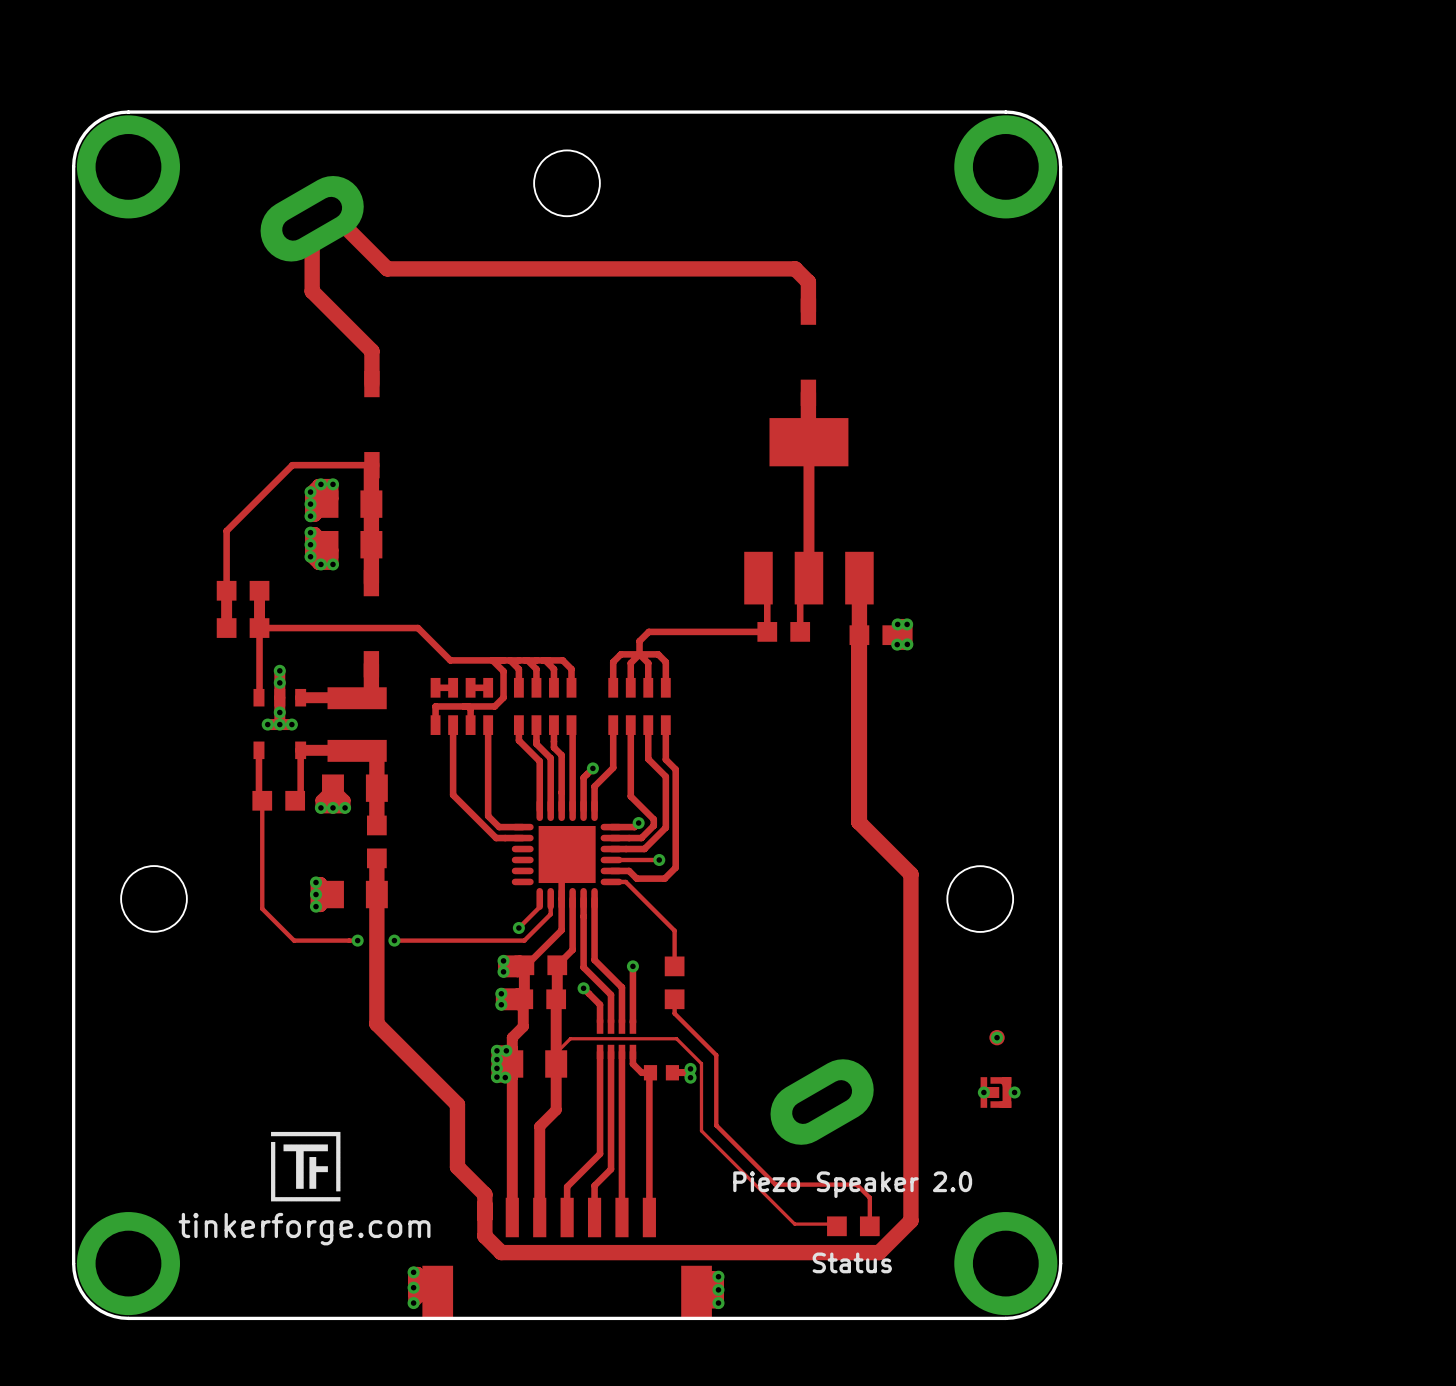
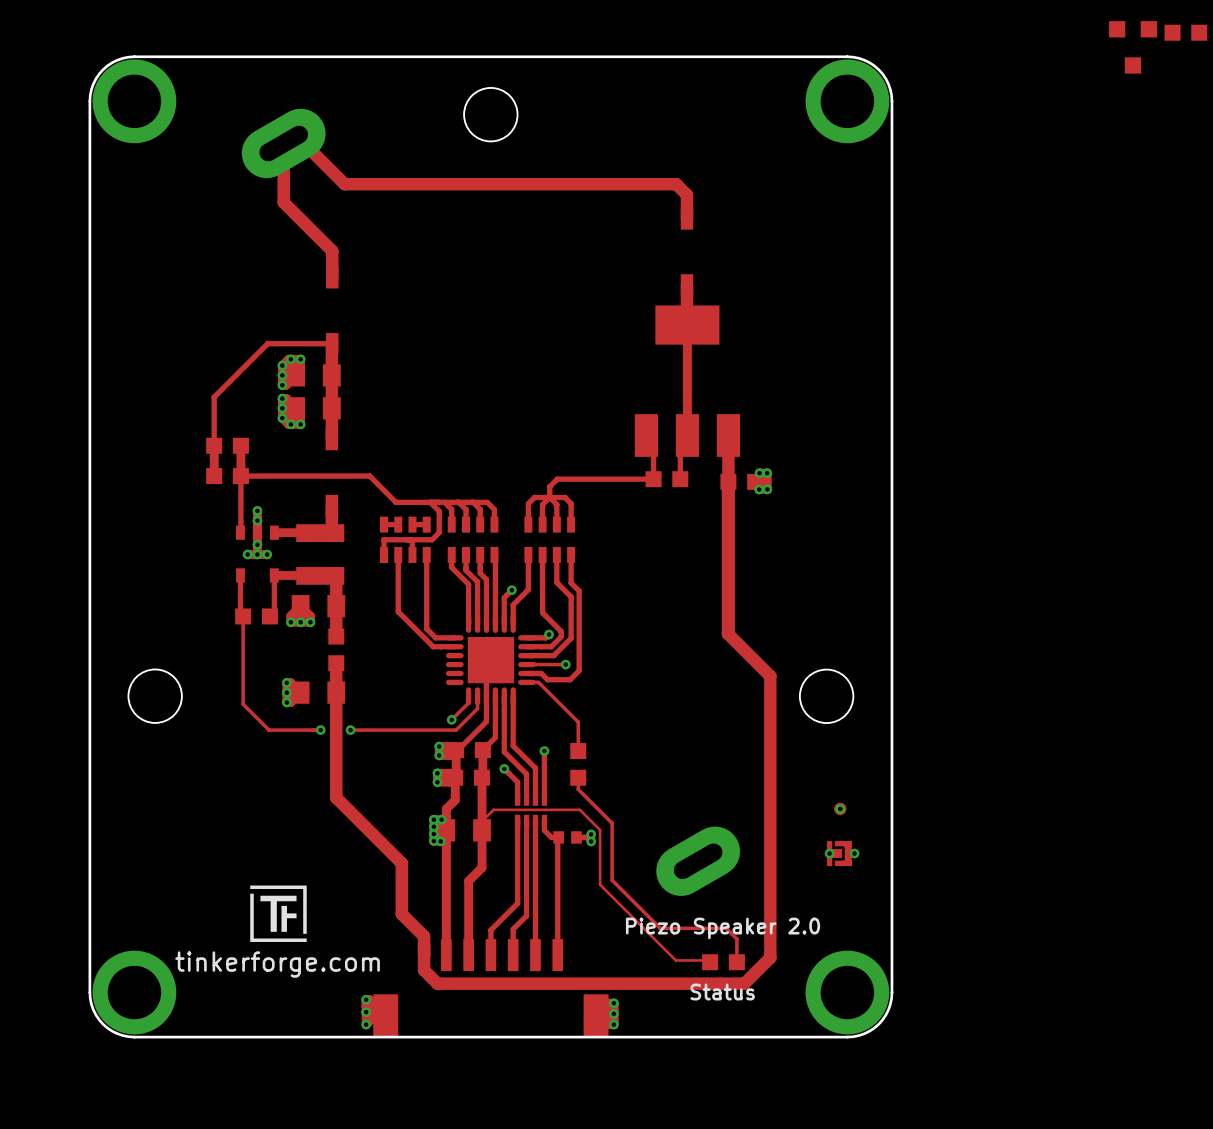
part: none -> (1185, 32)
part: none -> (1133, 47)

